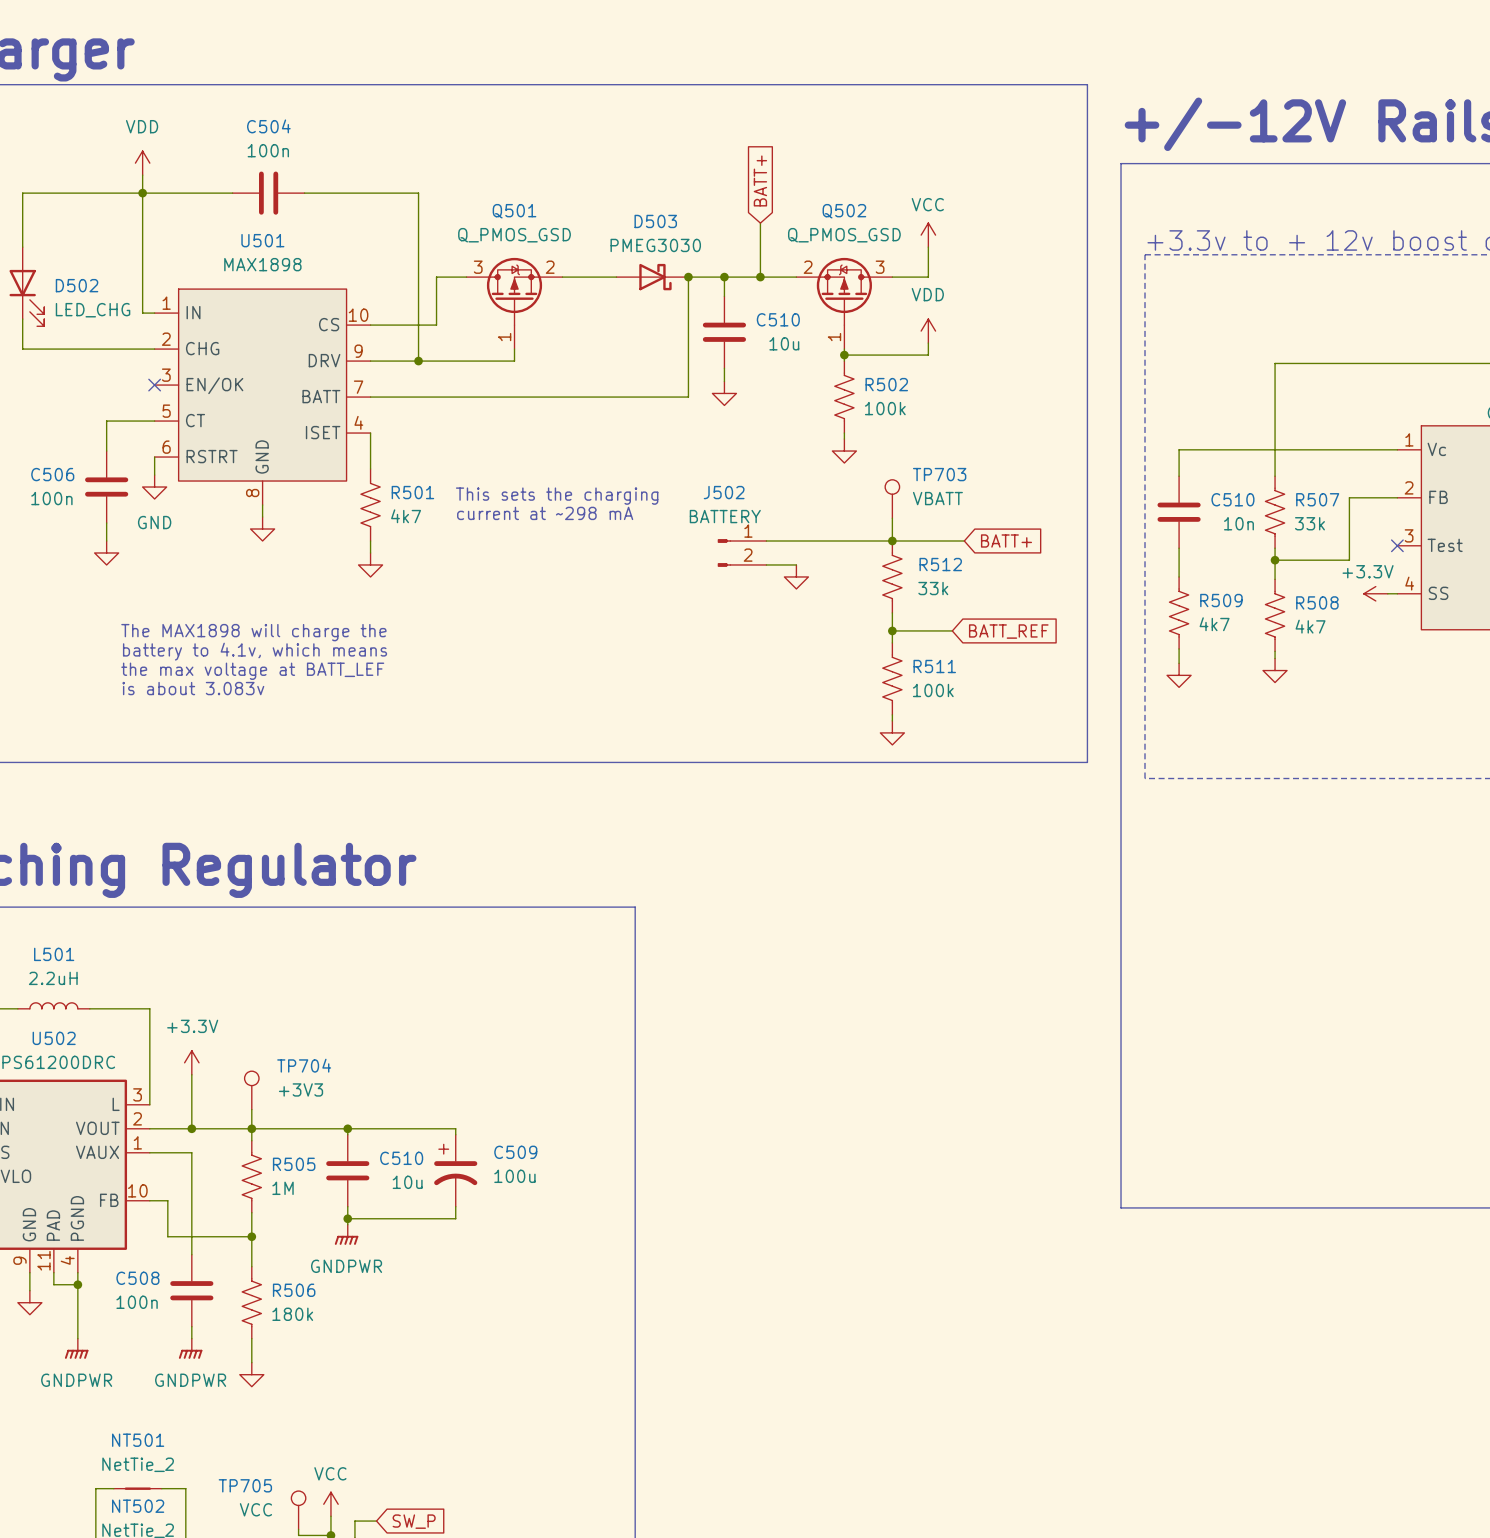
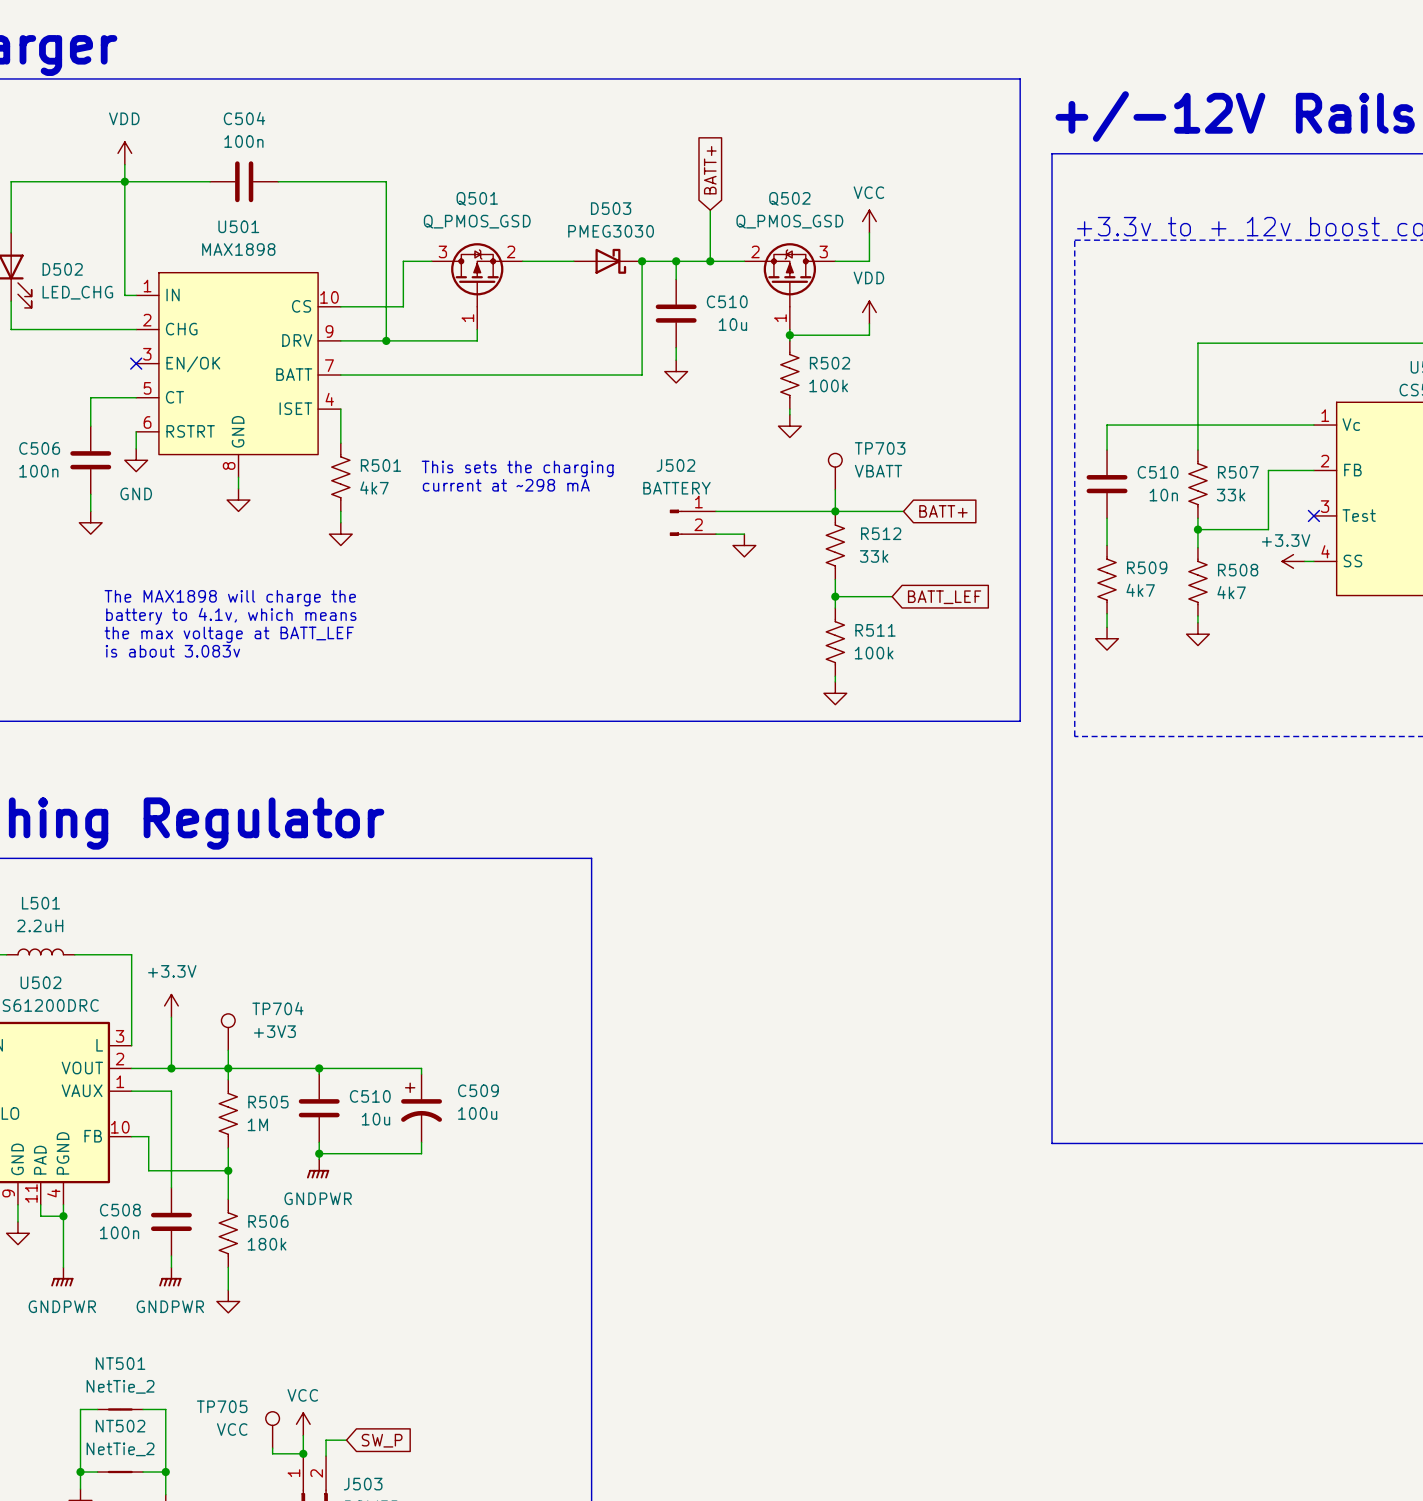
global label: BATT_REF (1008, 631) -> BATT_LEF (944, 597)

